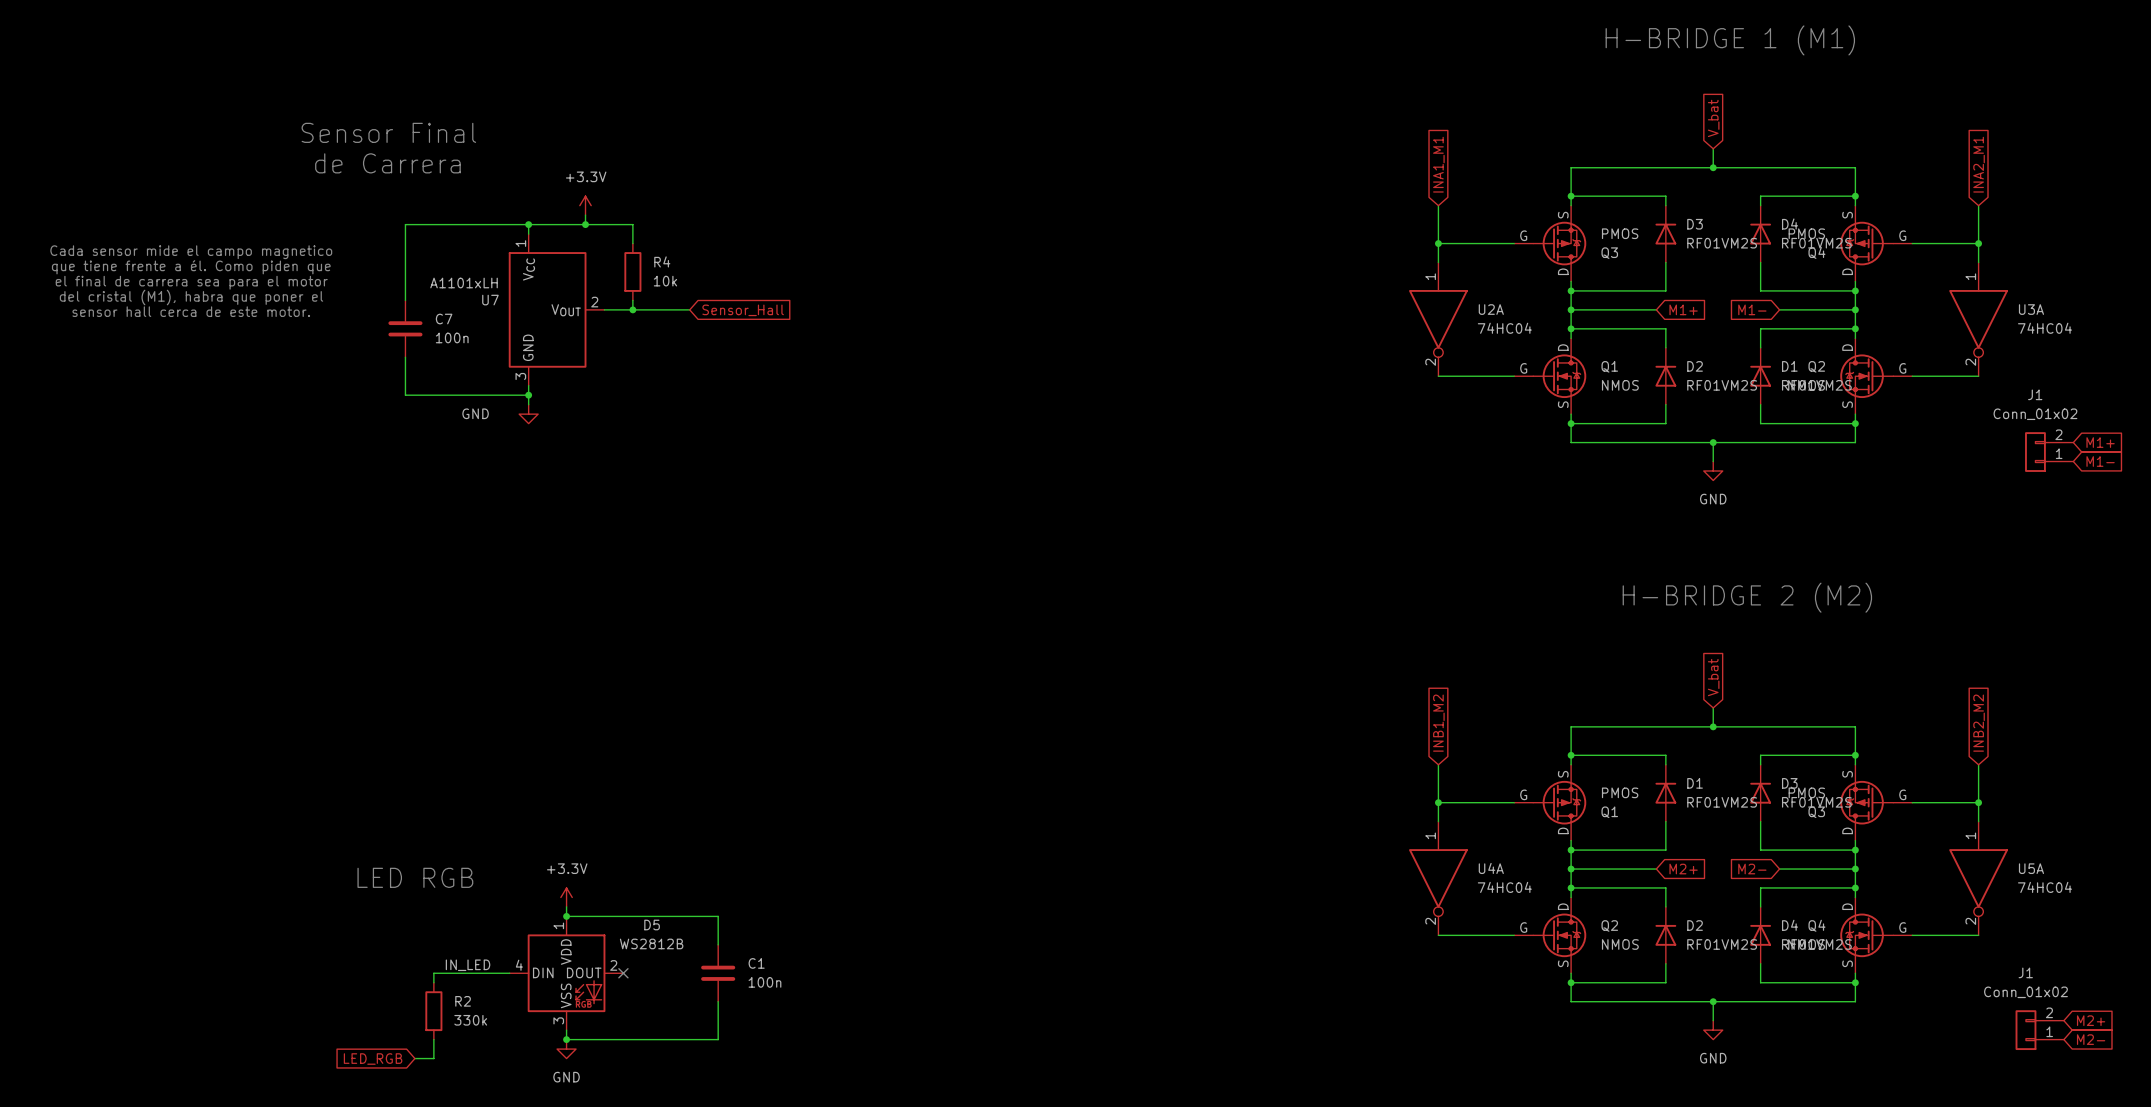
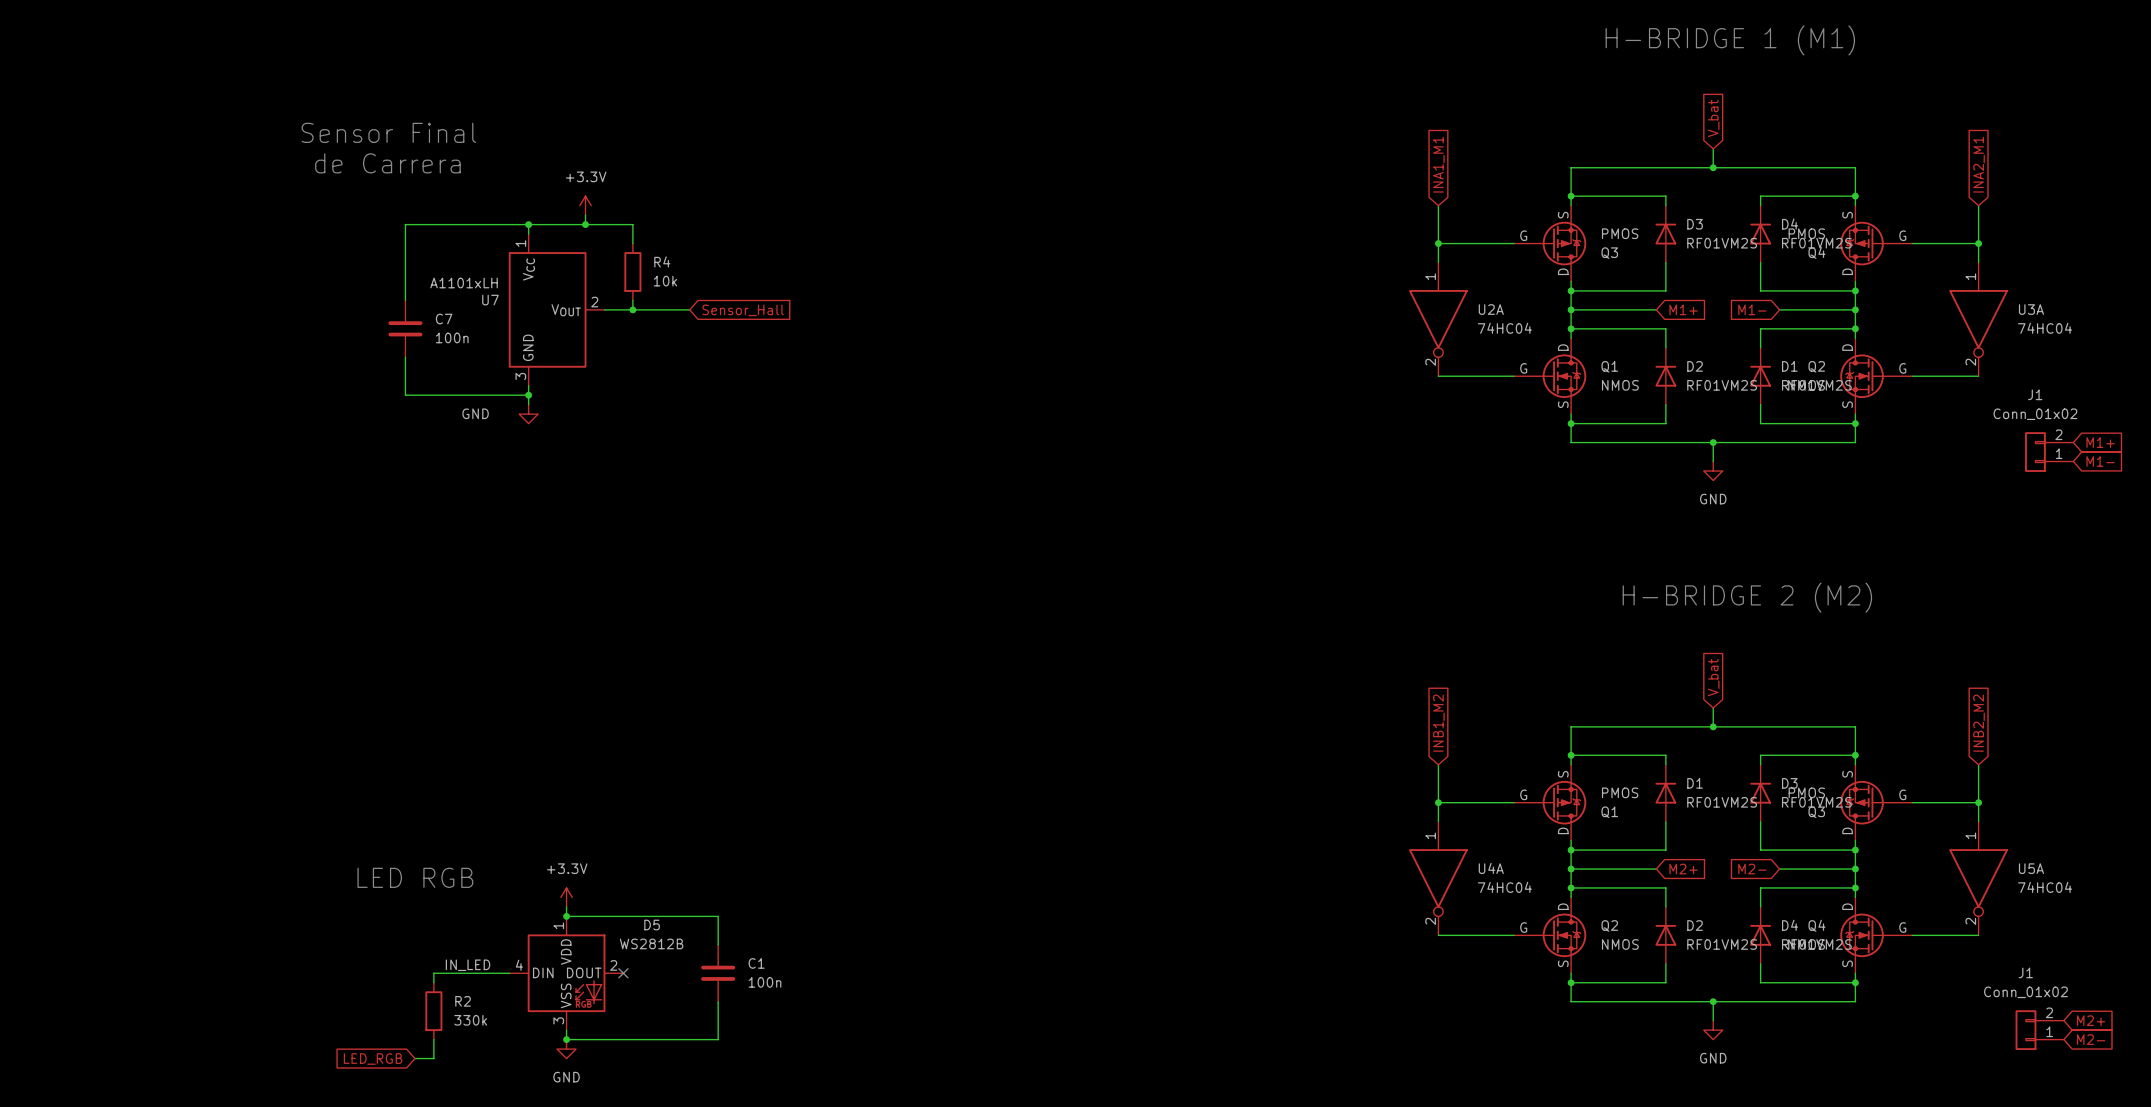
text: Cada sensor mide el campo magnetico (191, 252) -> none
text: que tiene frente a él. Como piden que (191, 267) -> none
text: el final de carrera sea para el motor (191, 282) -> none
text: del cristal (M1), habra que poner el (191, 297) -> none
text: sensor hall cerca de este motor. (191, 311) -> none

